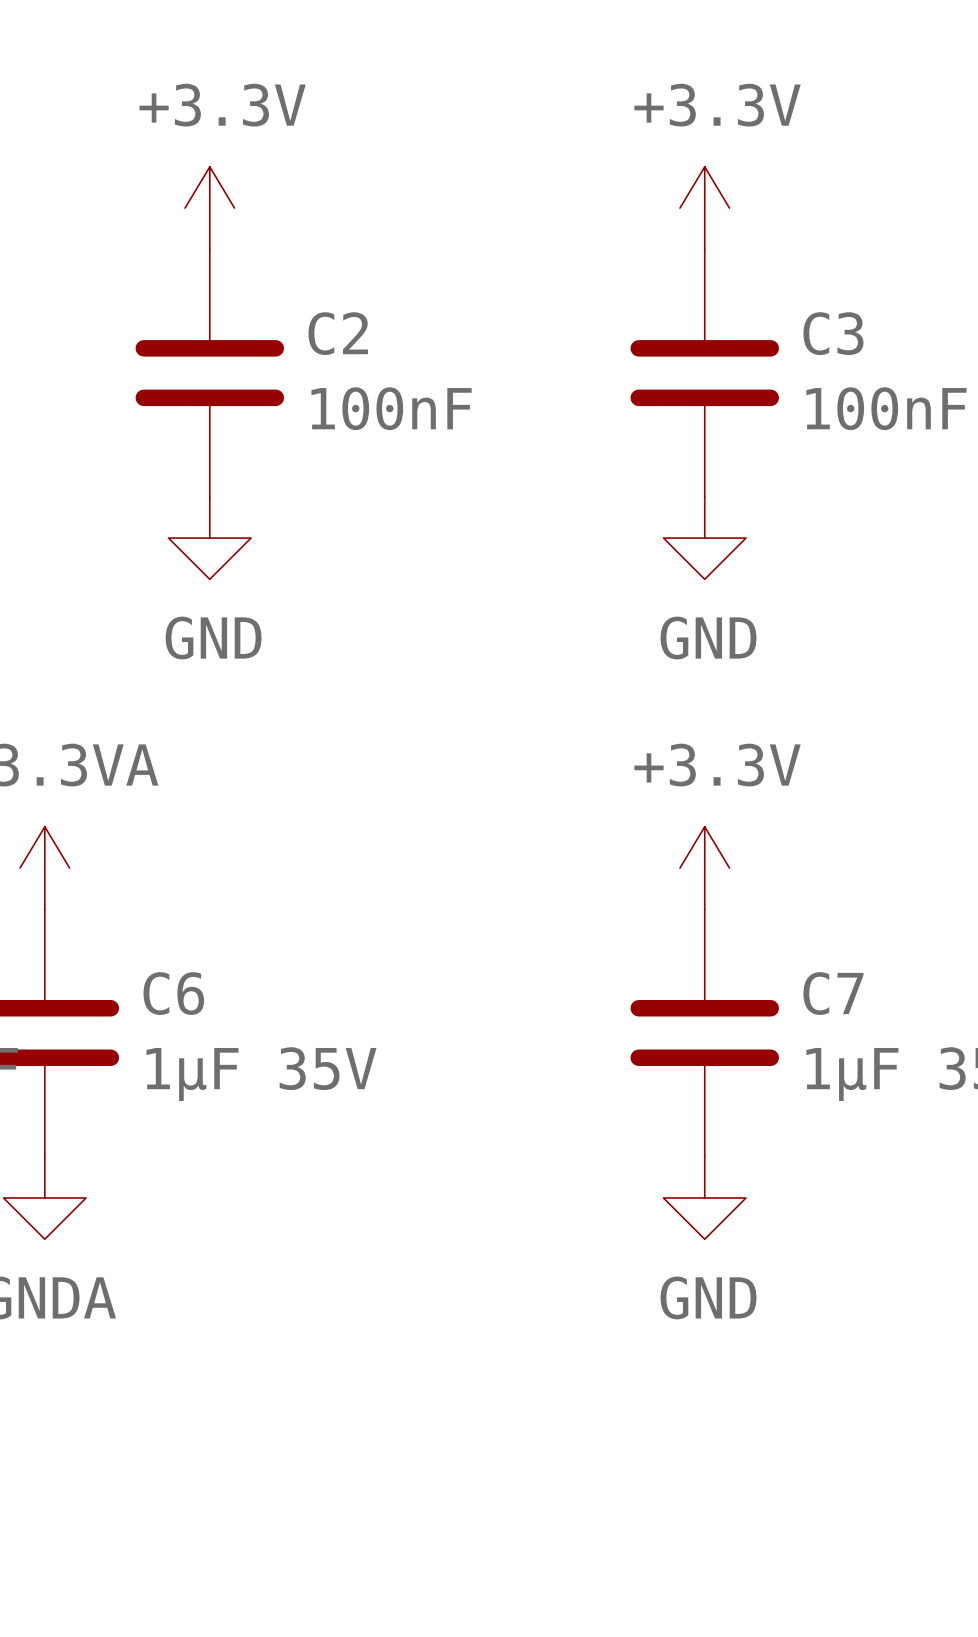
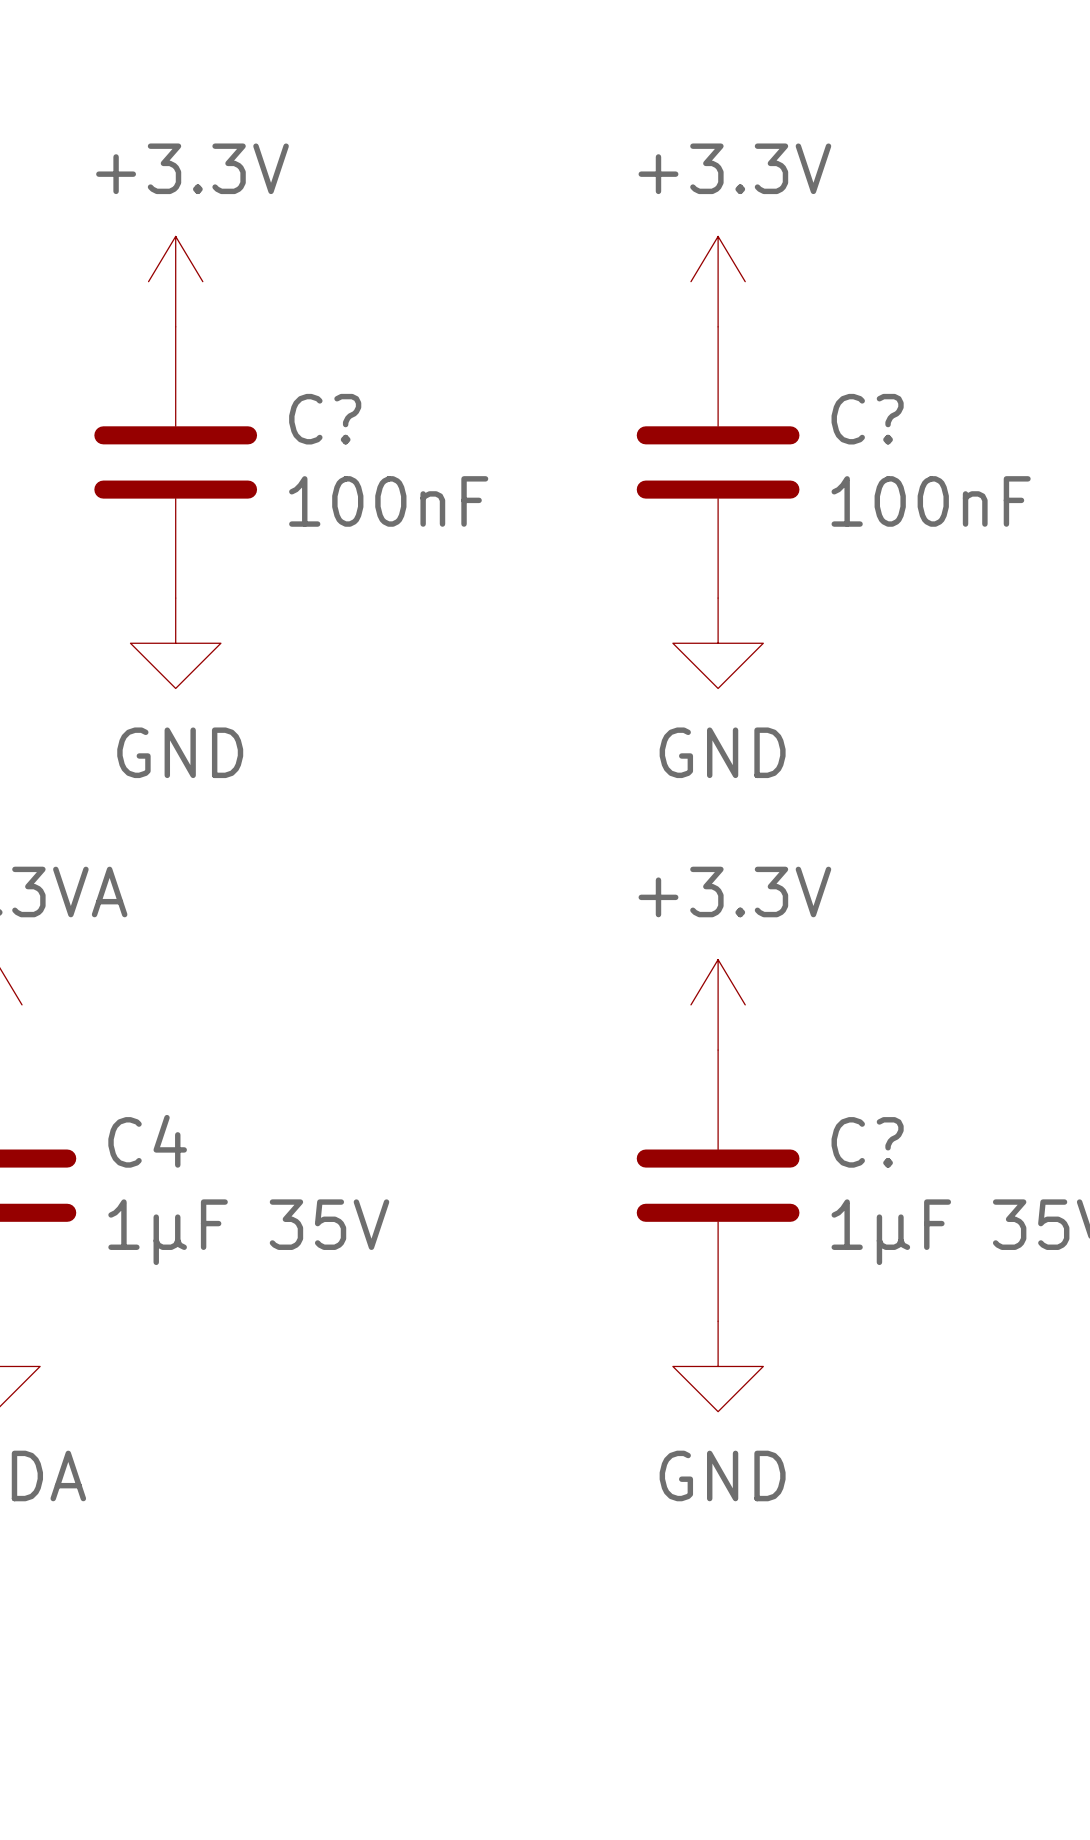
C2 name: C2 (338, 333) -> C? (325, 419)
C3 name: C3 (833, 333) -> C? (867, 419)
C6 name: C6 (173, 993) -> C4 (147, 1141)
C7 name: C7 (833, 993) -> C? (867, 1142)

